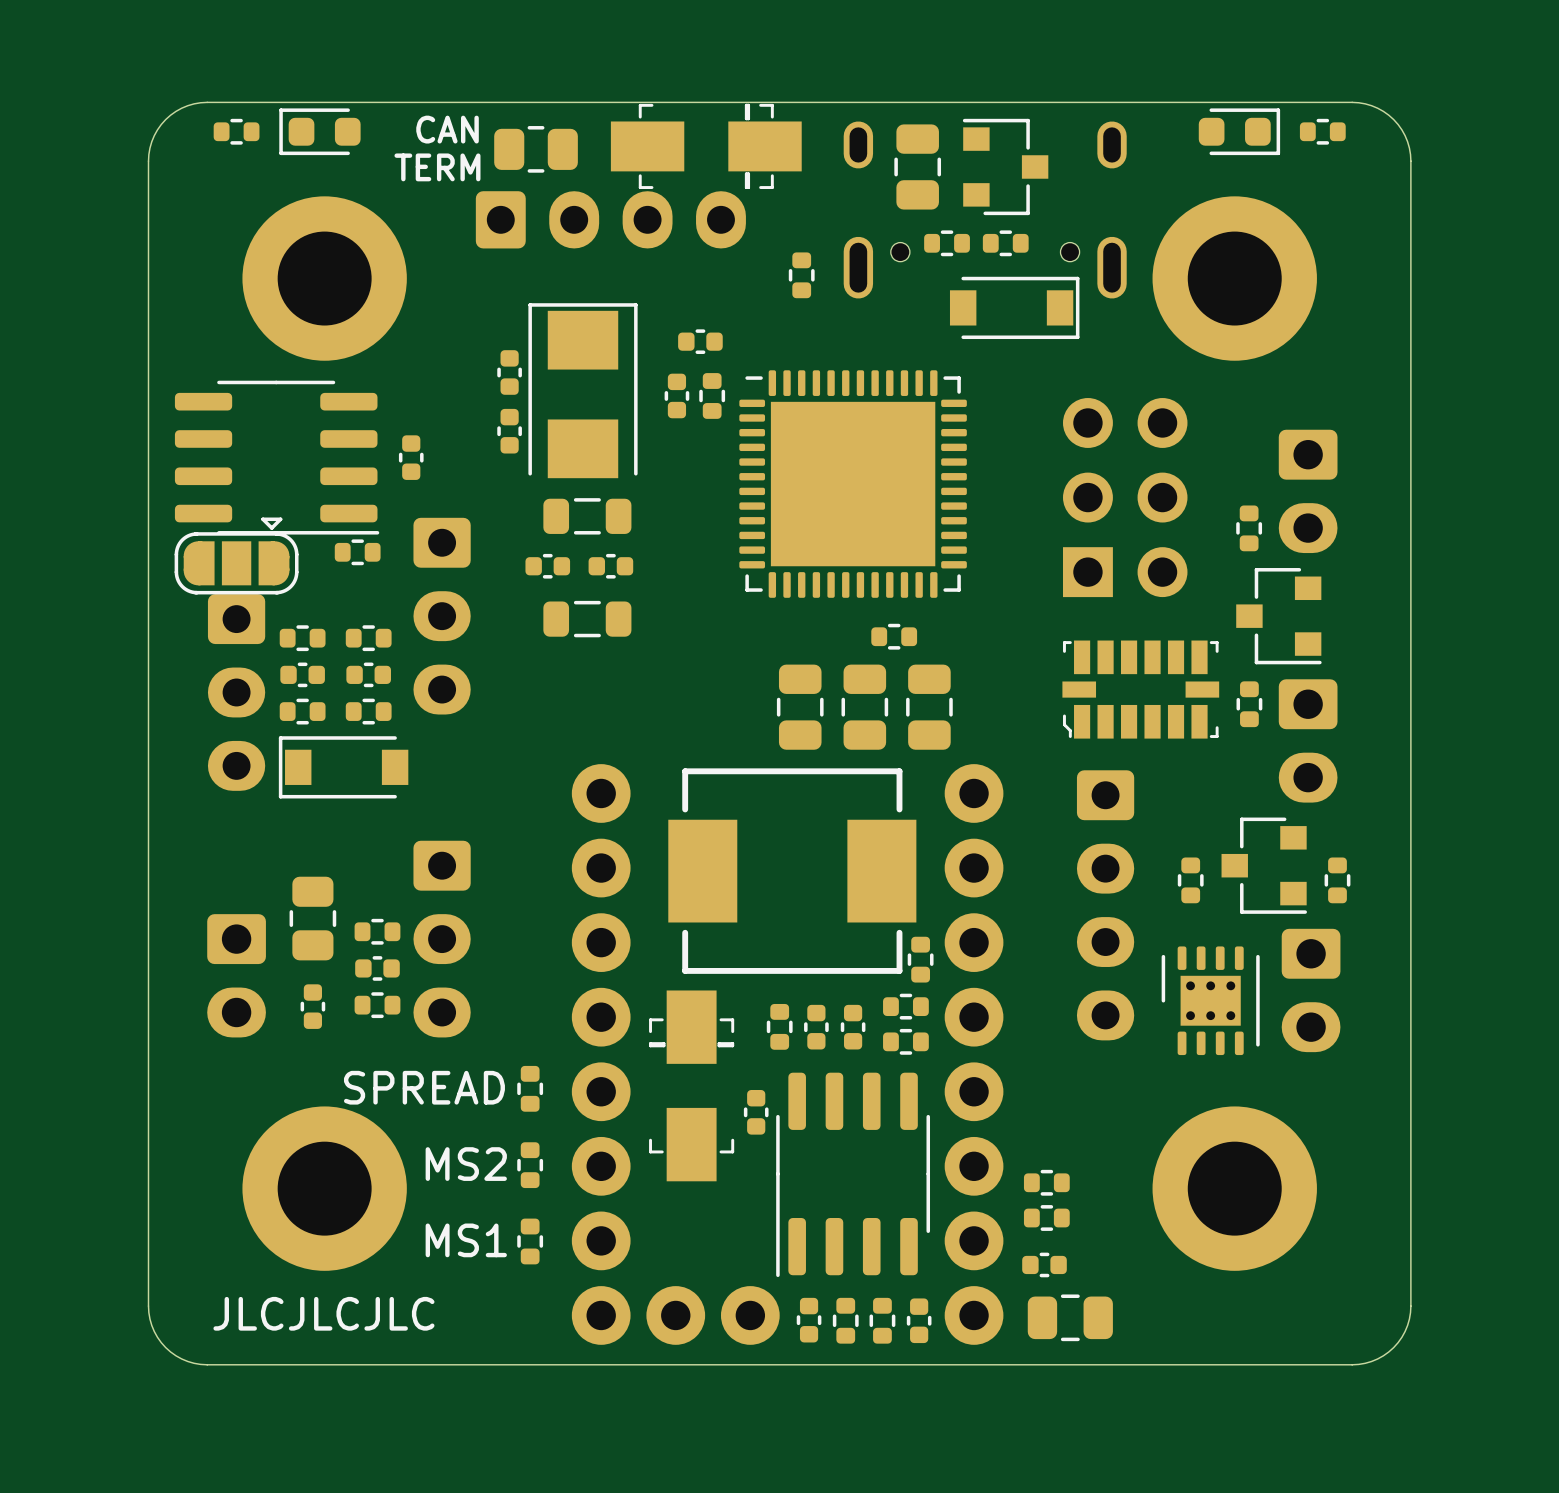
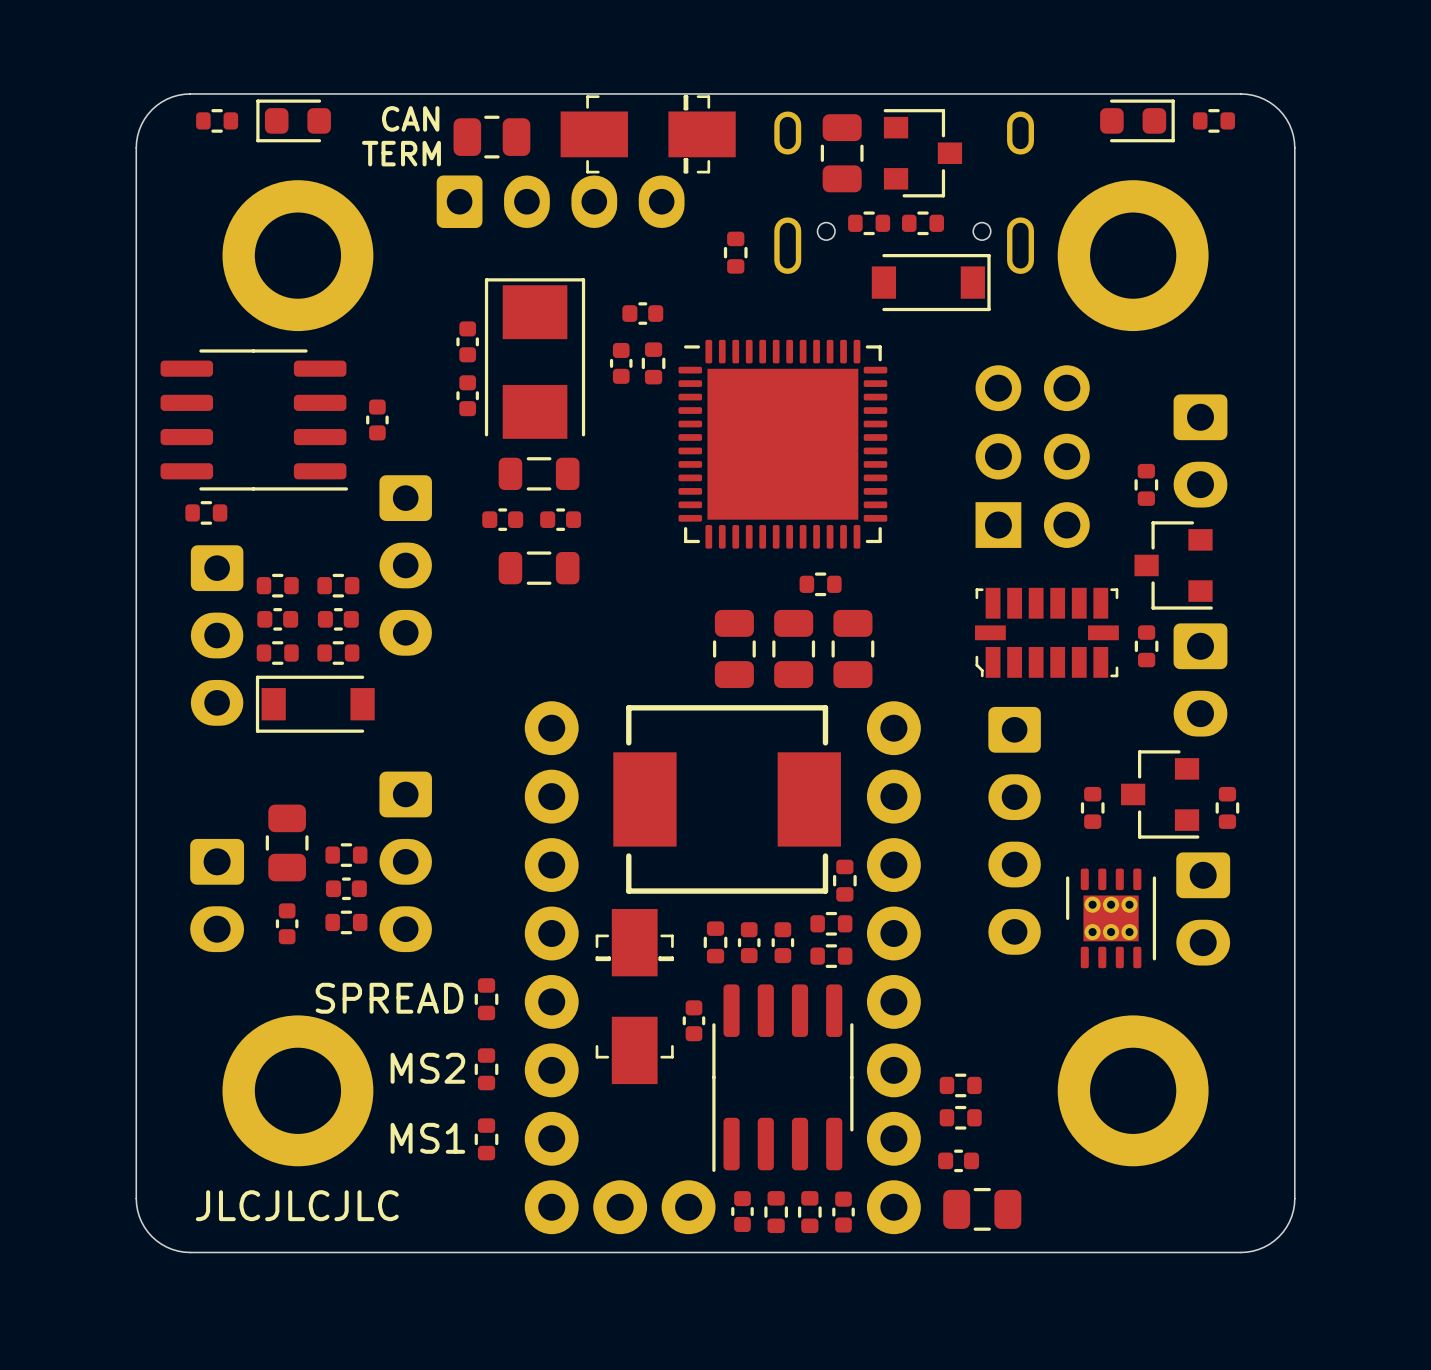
part footprint: [174, 517, 299, 595] -> [185, 501, 228, 525]
part: (357, 552) -> none

